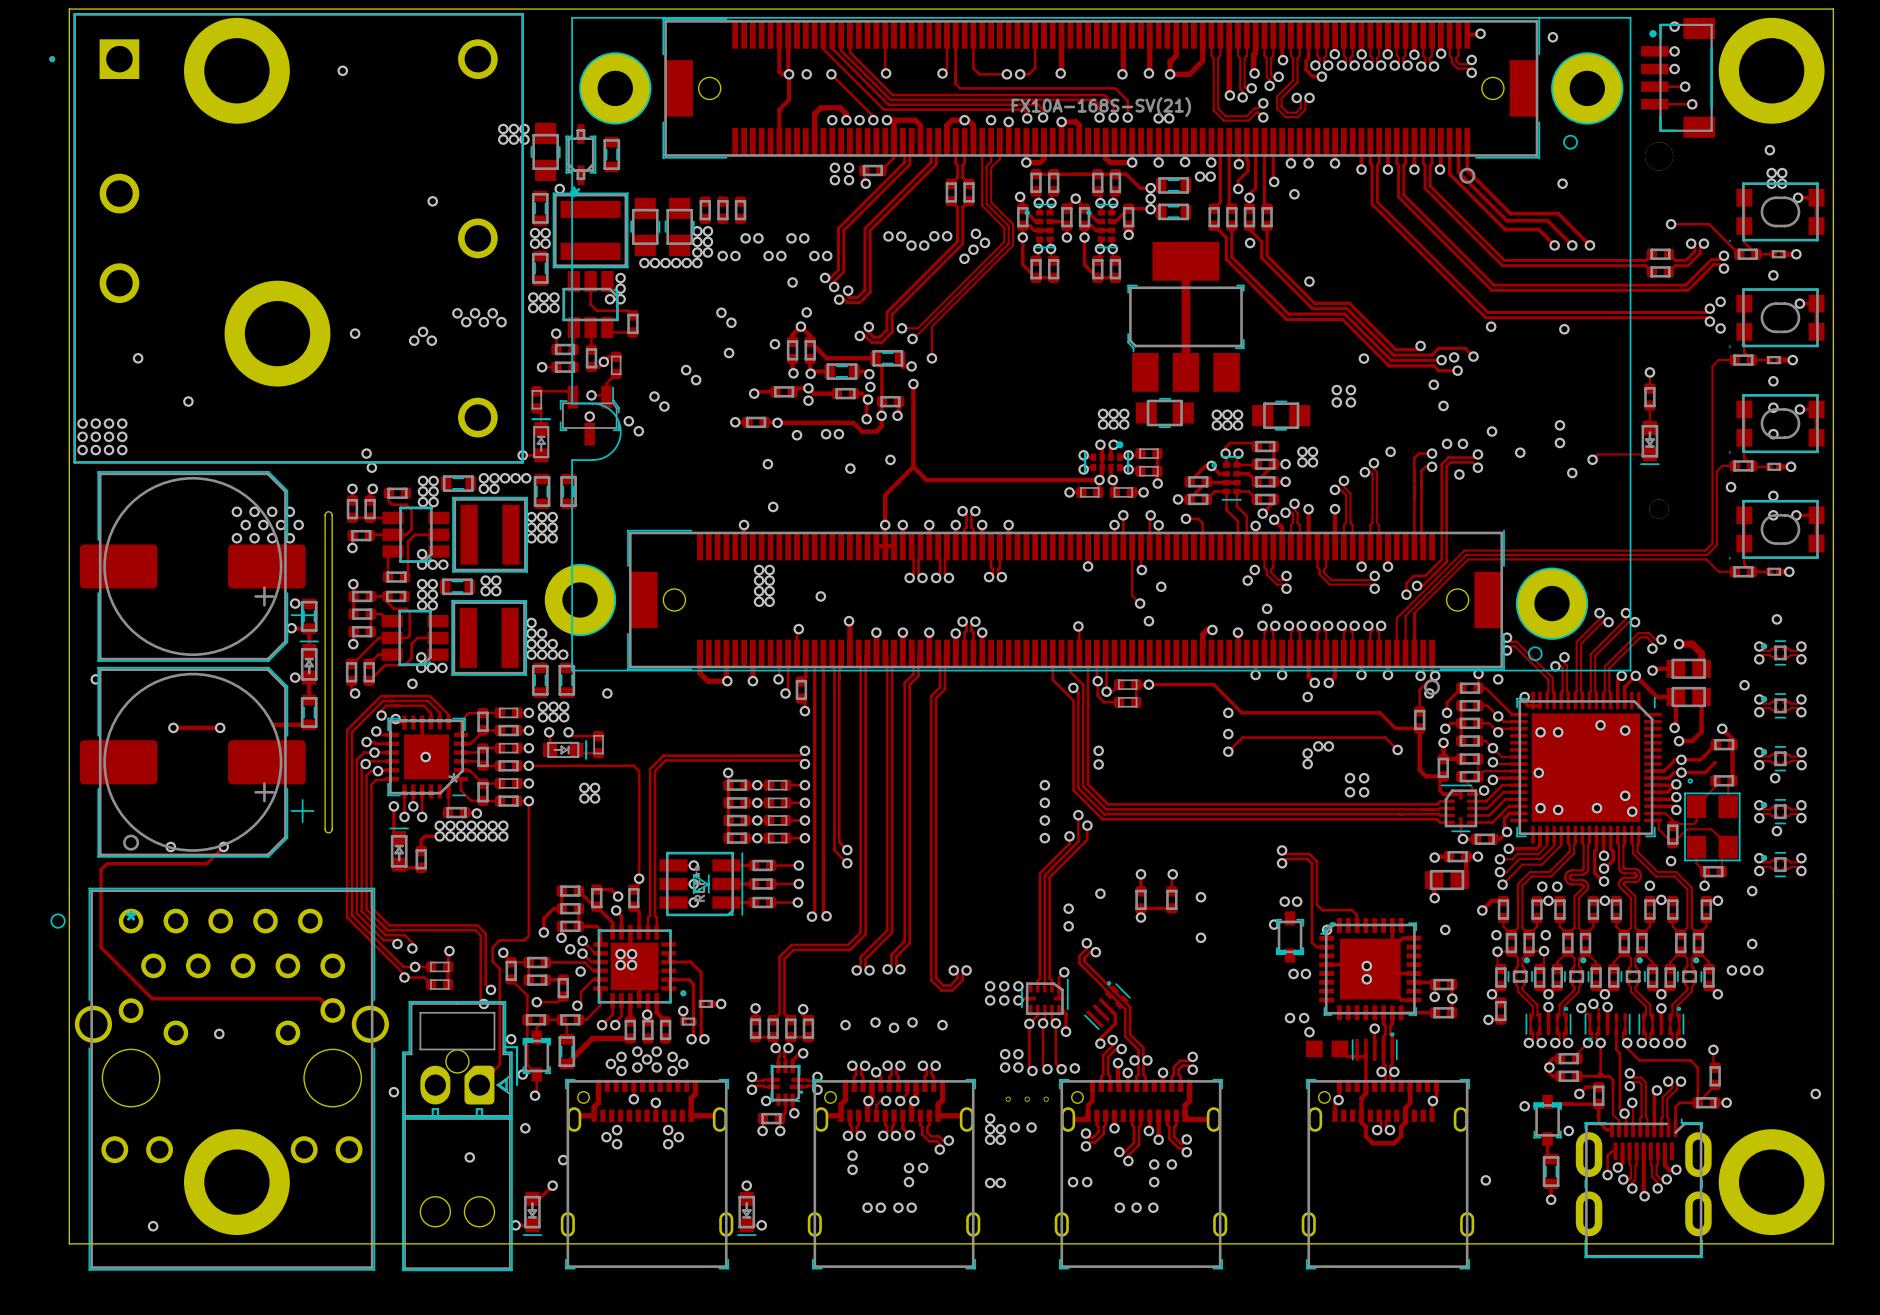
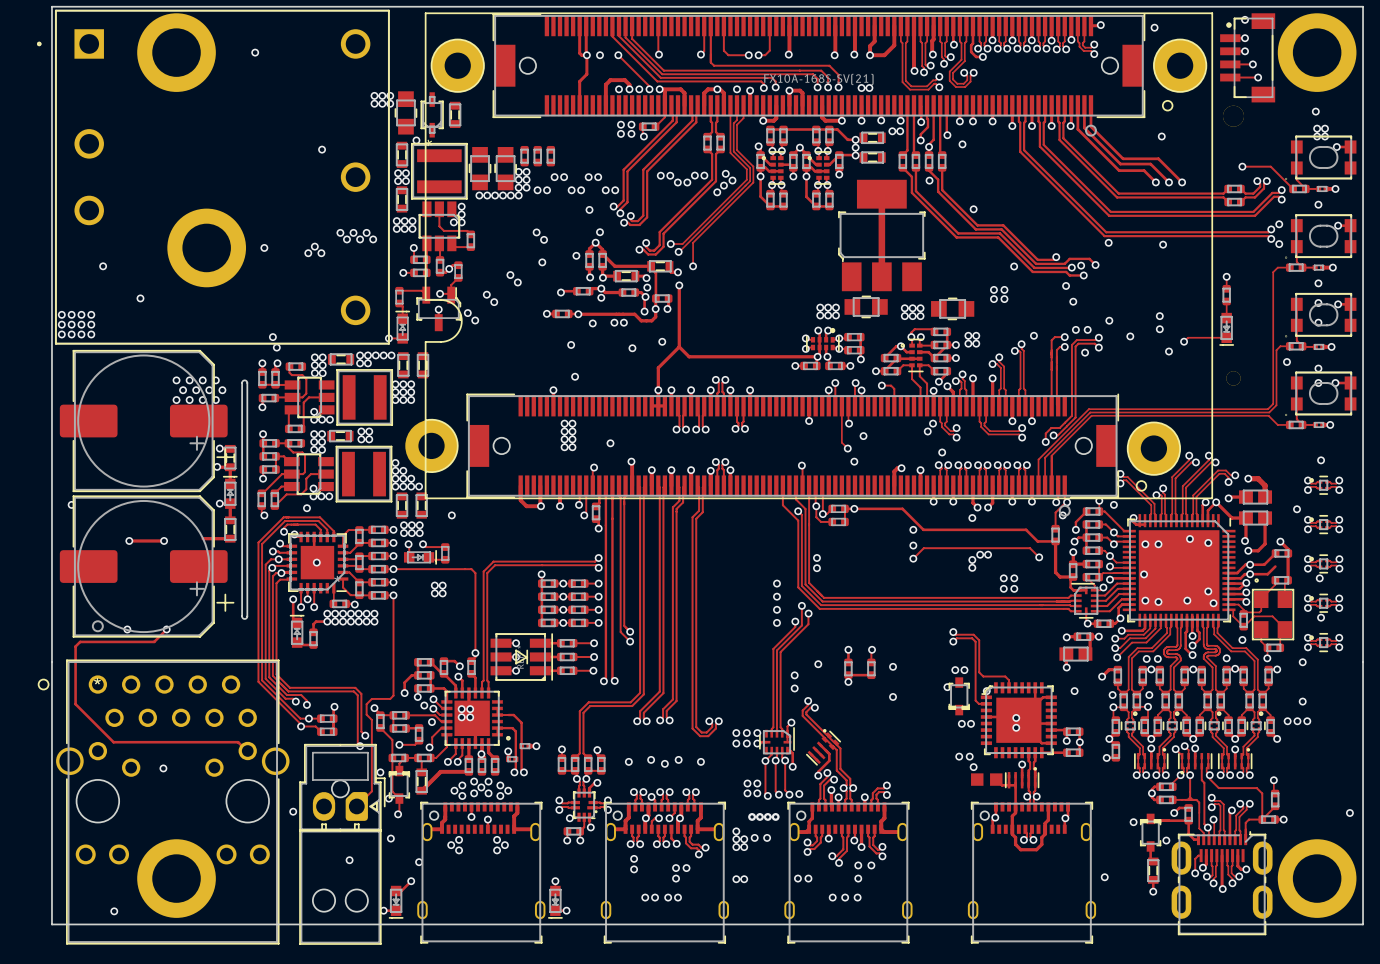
via: none -> (752, 816)
via: none -> (759, 816)
part: (1027, 1099) -> none
via: none -> (767, 816)
via: none -> (775, 816)

